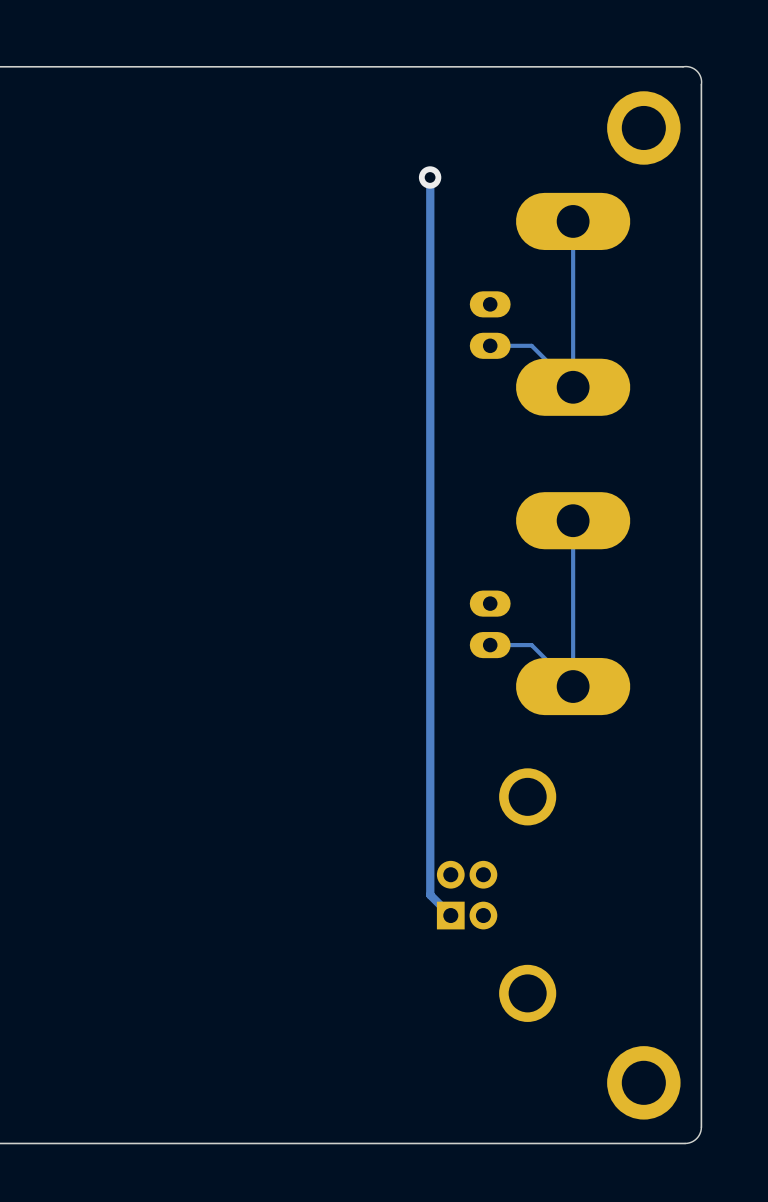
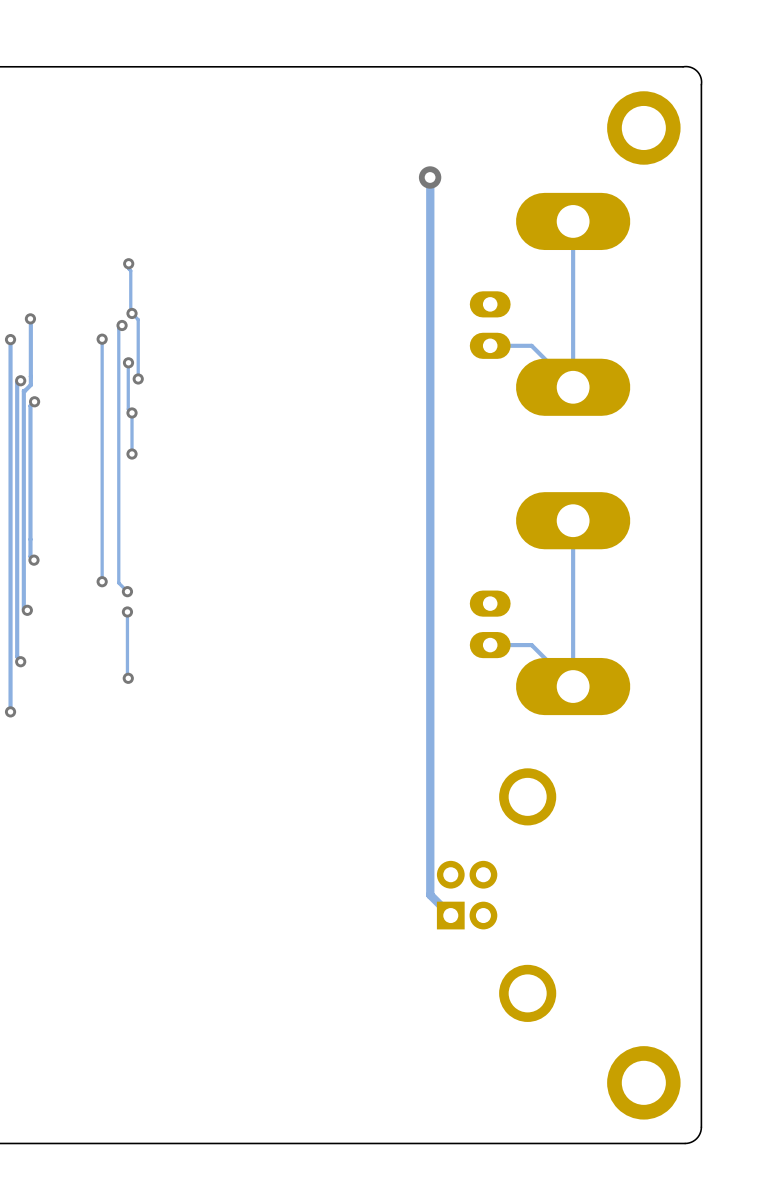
track: none -> (128, 263) (130, 270) (130, 312) (138, 319) (138, 378)
via: none -> (128, 263)
via: none -> (132, 313)
track: none -> (30, 318) (30, 376)
via: none -> (30, 318)
track: none -> (122, 325) (118, 328) (118, 582) (127, 591)
via: none -> (122, 325)
track: none -> (10, 339) (10, 711)
via: none -> (10, 339)
track: none -> (102, 339) (102, 581)
via: none -> (102, 339)
track: none -> (128, 362) (128, 409) (132, 412) (132, 454)
via: none -> (128, 362)
track: none -> (30, 376) (30, 384) (23, 390) (23, 609) (27, 610)
via: none -> (138, 378)
track: none -> (20, 380) (17, 382) (17, 656) (20, 661)
via: none -> (20, 380)
track: none -> (34, 401) (30, 405) (30, 556) (33, 560)
via: none -> (34, 401)
via: none -> (132, 412)
via: none -> (132, 454)
via: none -> (33, 560)
via: none -> (102, 581)
via: none -> (127, 591)
via: none -> (27, 610)
track: none -> (127, 611) (128, 678)
via: none -> (127, 611)
via: none -> (20, 661)
via: none -> (128, 678)
via: none -> (10, 711)

